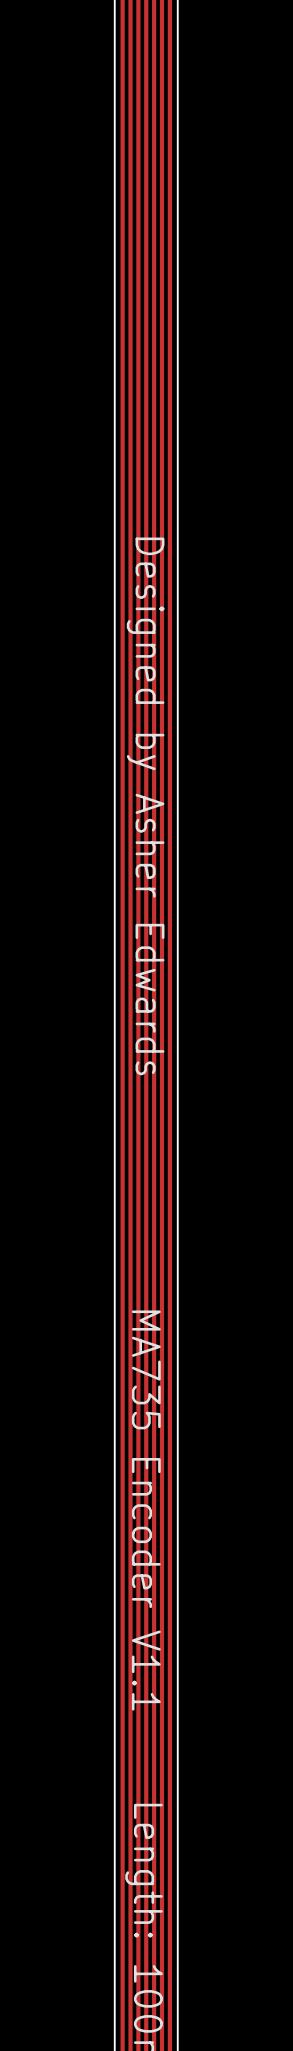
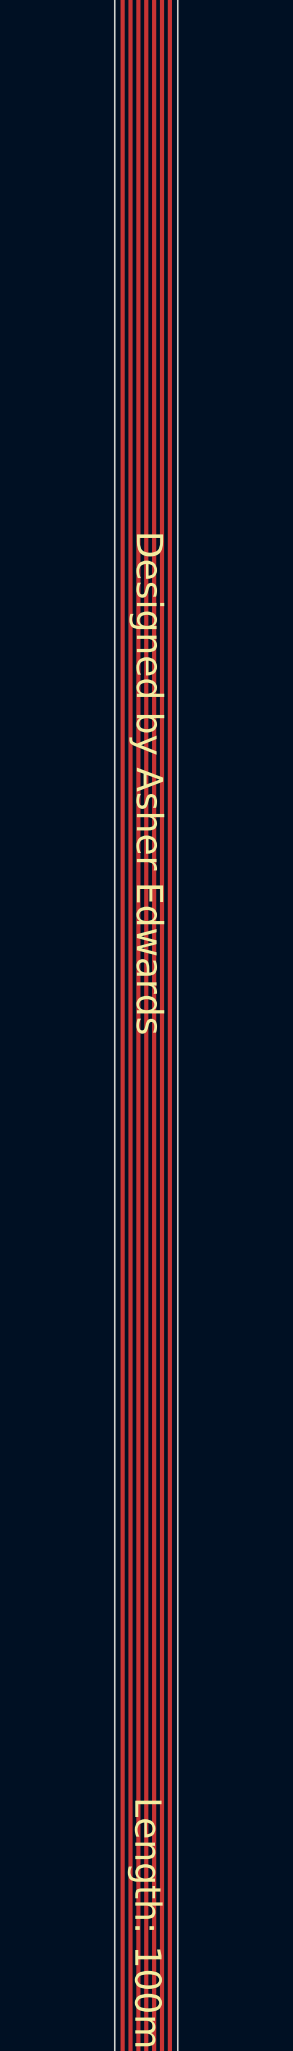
text: MA735 Encoder V1.1 (146, 1510) -> none

